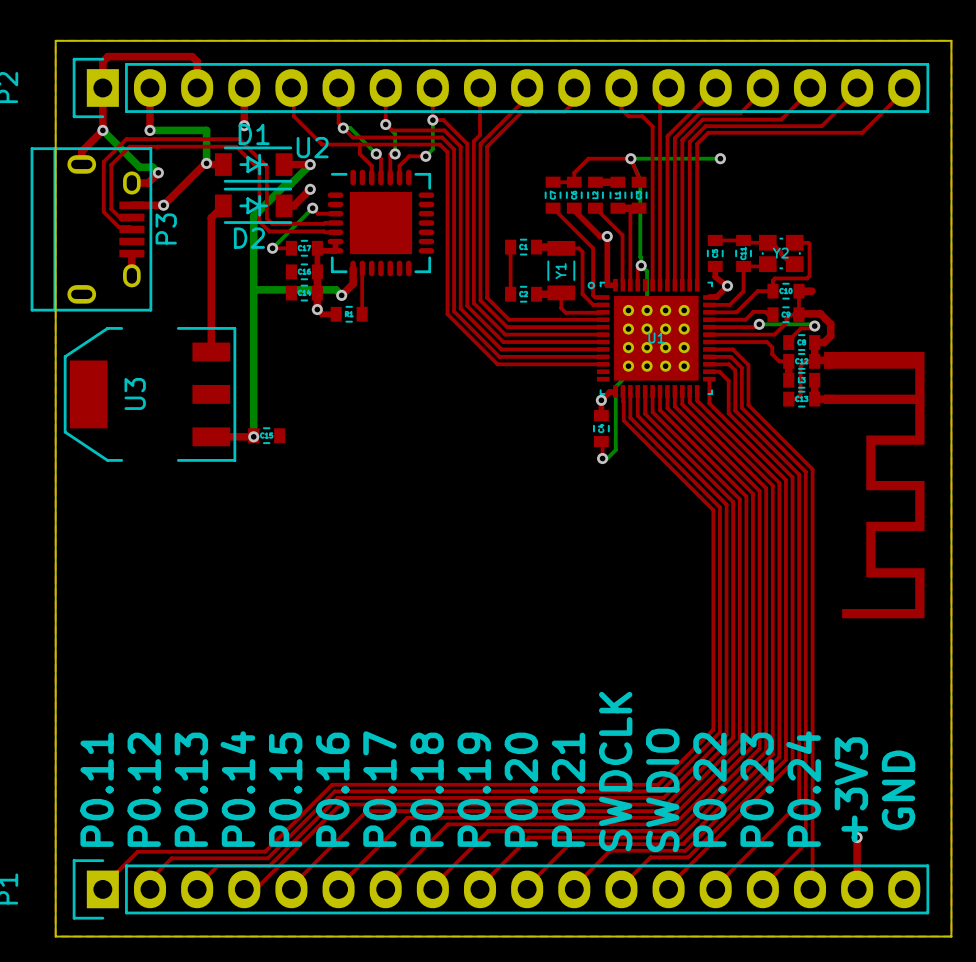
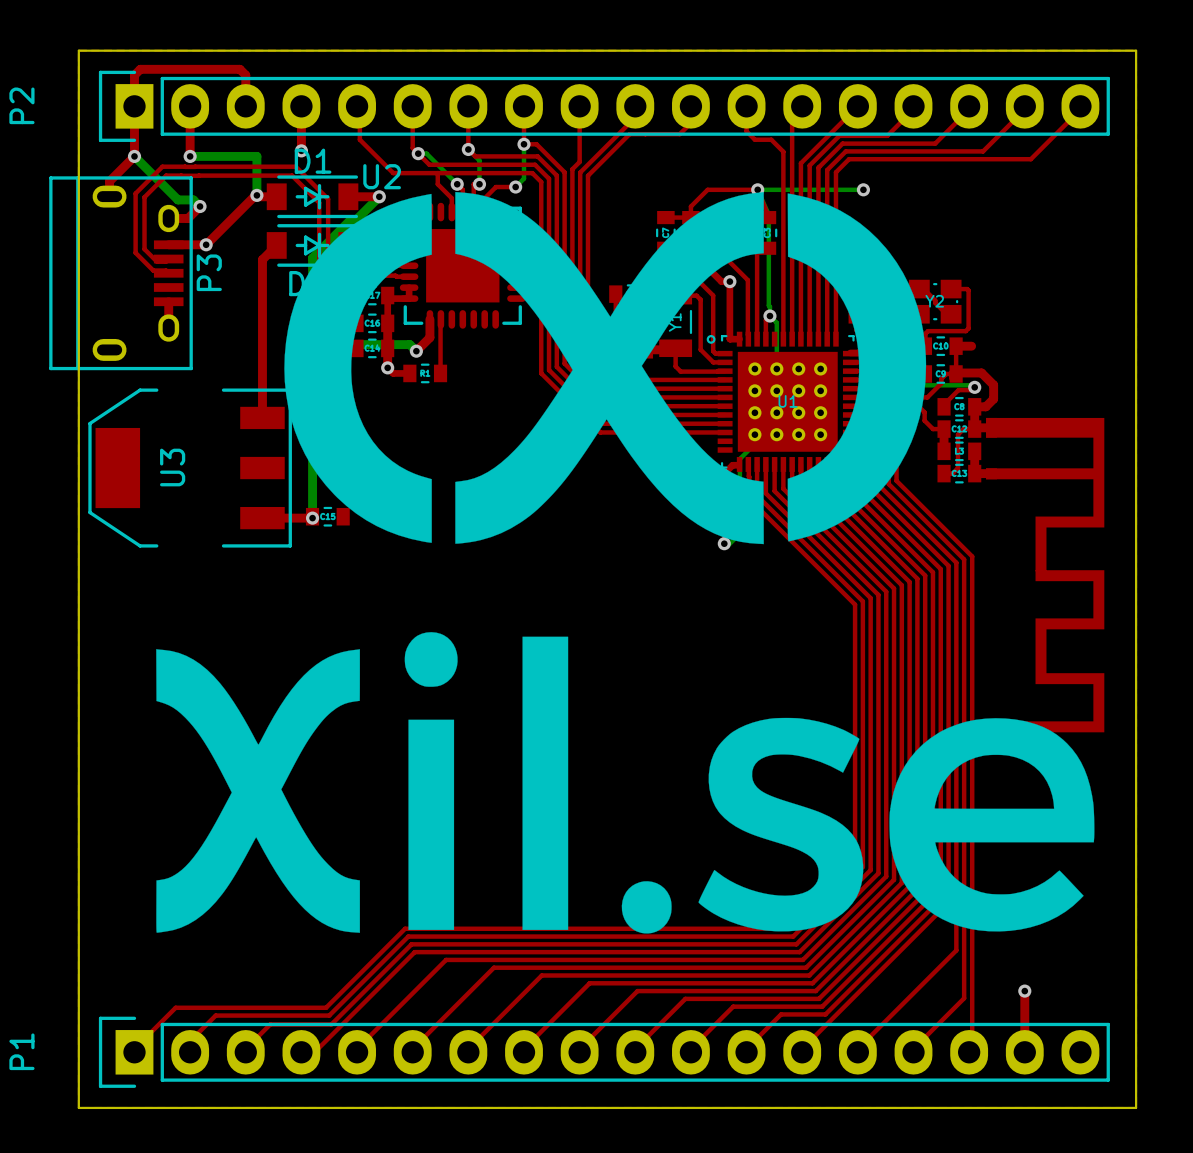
drawing: none -> [156, 191, 1095, 934]
text: SWDCLK (615, 771) -> none
text: P0.11 (97, 789) -> none
text: P0.12 (144, 789) -> none
text: P0.13 (191, 789) -> none
text: P0.14 (237, 789) -> none
text: P0.15 (285, 789) -> none
text: P0.16 (332, 789) -> none
text: P0.17 (379, 789) -> none
text: P0.18 (427, 789) -> none
text: P0.19 (474, 789) -> none
text: P0.20 (521, 789) -> none
text: P0.21 (568, 789) -> none
text: P0.22 (709, 789) -> none
text: P0.23 (757, 789) -> none
text: P0.24 (803, 789) -> none
text: +3V3 (851, 789) -> none
text: SWDIO (662, 790) -> none
text: GND (898, 790) -> none

